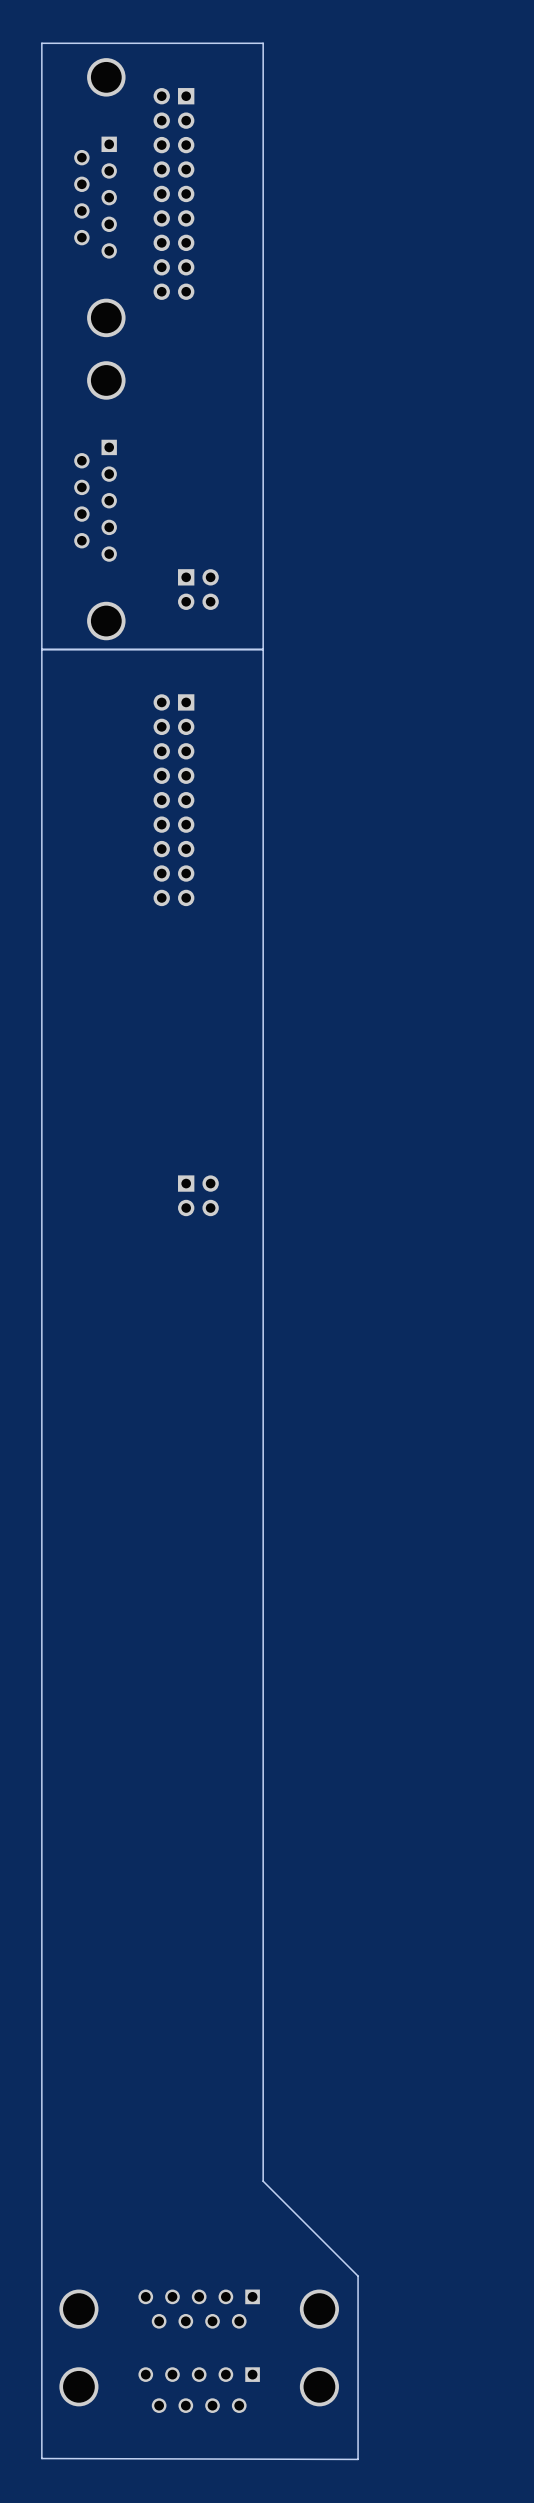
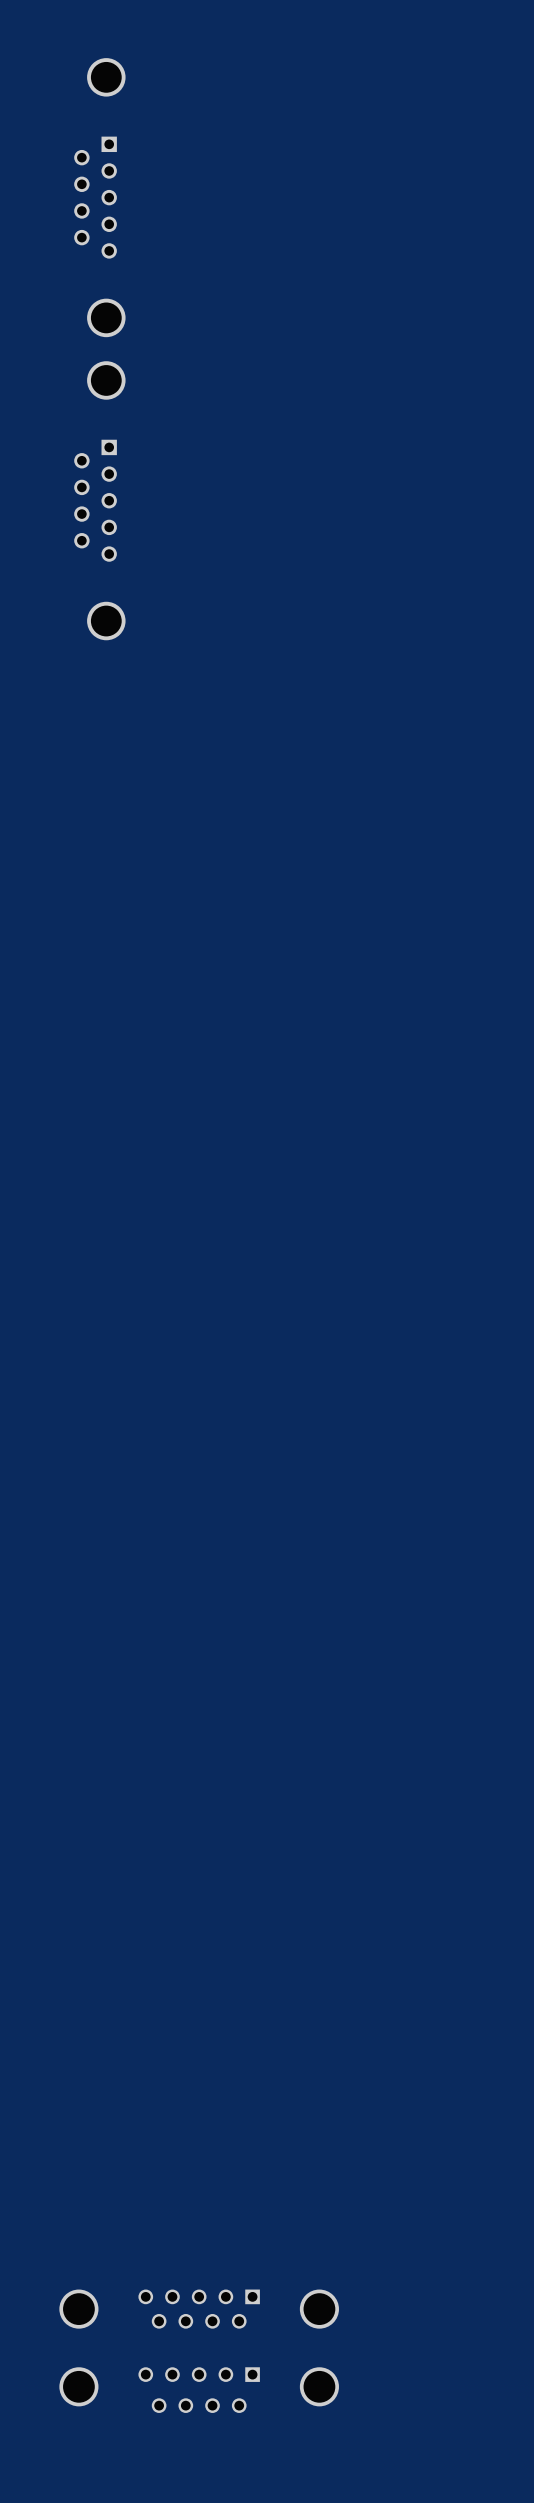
board edge: (263, 43) (263, 2181) (358, 2276) (358, 2459) (41, 2458) (41, 43) (263, 43) -> none
part: (173, 193) -> none
part: (198, 589) -> none
board edge: (263, 649) (41, 649) -> none
part: (173, 800) -> none
part: (198, 1195) -> none

